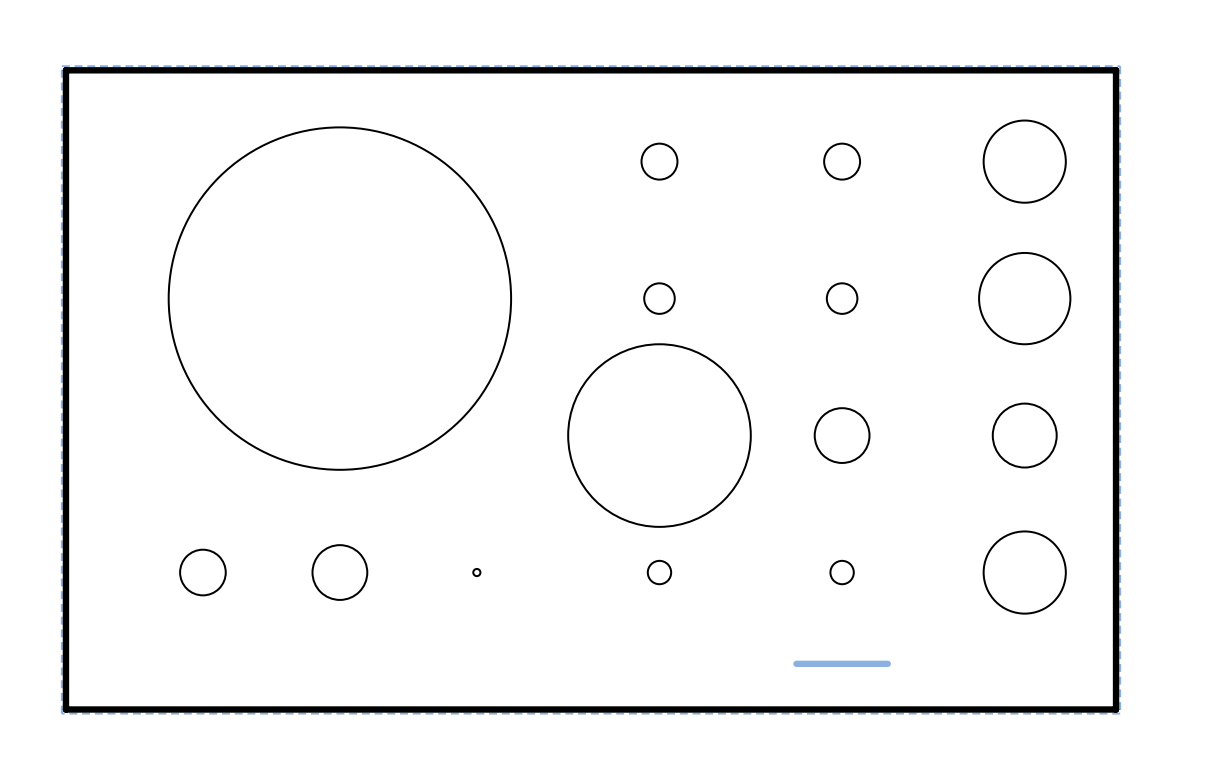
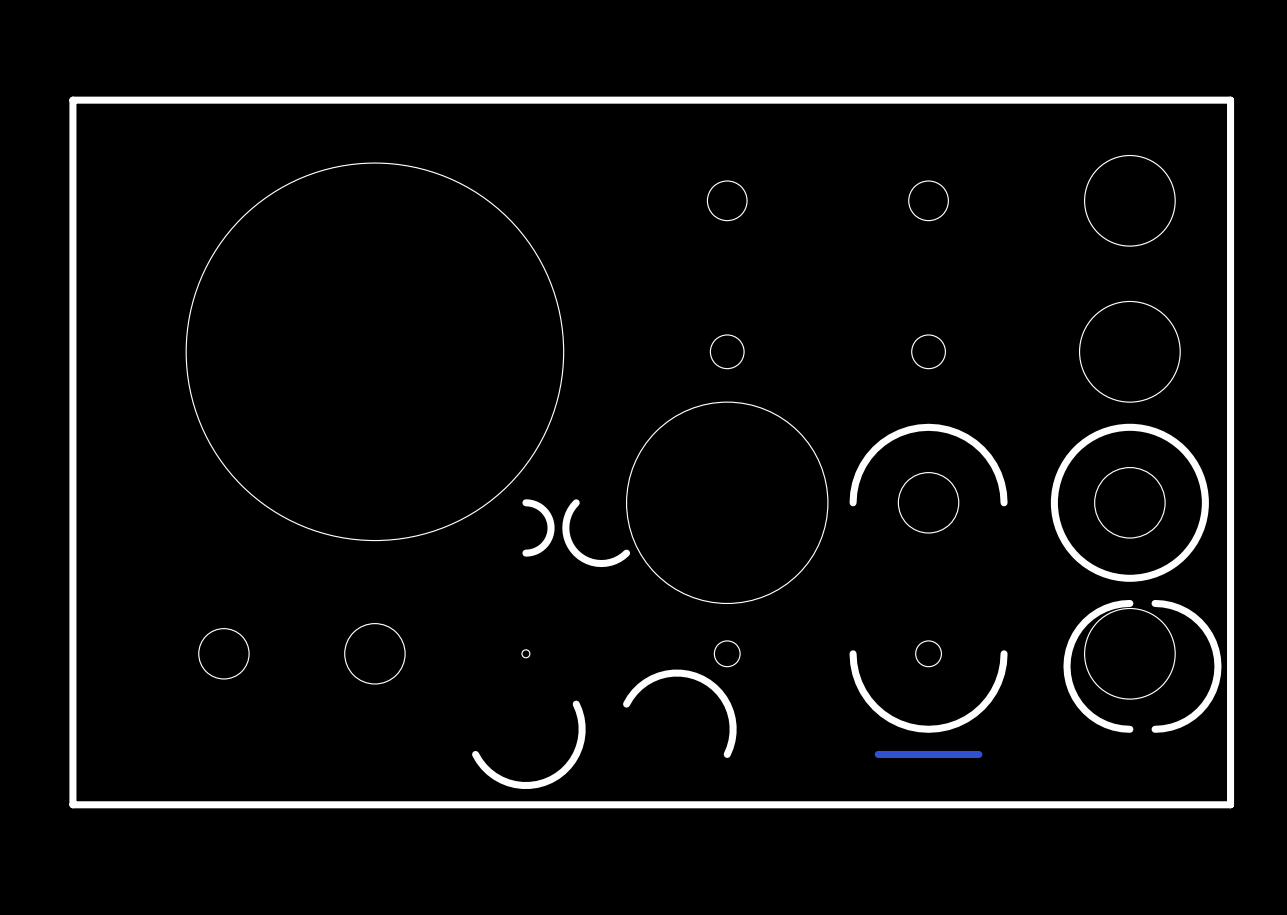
zone outline: (1120, 66) (61, 66) (61, 713) (1120, 713) (1120, 66) -> none
round board edge: none -> [1050, 423, 1209, 582]
board edge: none -> (525, 502) (535, 504) (543, 510) (549, 518) (551, 527) (549, 537) (543, 545) (535, 551) (525, 553)
board edge: none -> (576, 502) (568, 514) (565, 527) (568, 541) (576, 553) (587, 560) (601, 563) (615, 560) (626, 553)
board edge: none -> (1004, 502) (998, 473) (981, 449) (957, 433) (928, 427) (899, 433) (875, 449) (858, 473) (853, 502)
board edge: none -> (1129, 603) (1105, 608) (1085, 621) (1071, 642) (1066, 666) (1071, 690) (1085, 710) (1105, 724) (1129, 729)
board edge: none -> (1155, 603) (1179, 608) (1199, 621) (1213, 642) (1217, 666) (1213, 690) (1199, 710) (1179, 724) (1155, 729)
board edge: none -> (1004, 653) (998, 682) (981, 707) (957, 723) (928, 729) (899, 723) (875, 707) (858, 682) (853, 653)
board edge: none -> (576, 704) (582, 725) (579, 747) (568, 766) (551, 779) (529, 785) (508, 782) (489, 771) (475, 754)
board edge: none -> (626, 704) (640, 686) (659, 675) (680, 673) (702, 678) (719, 692) (730, 711) (733, 733) (727, 754)

